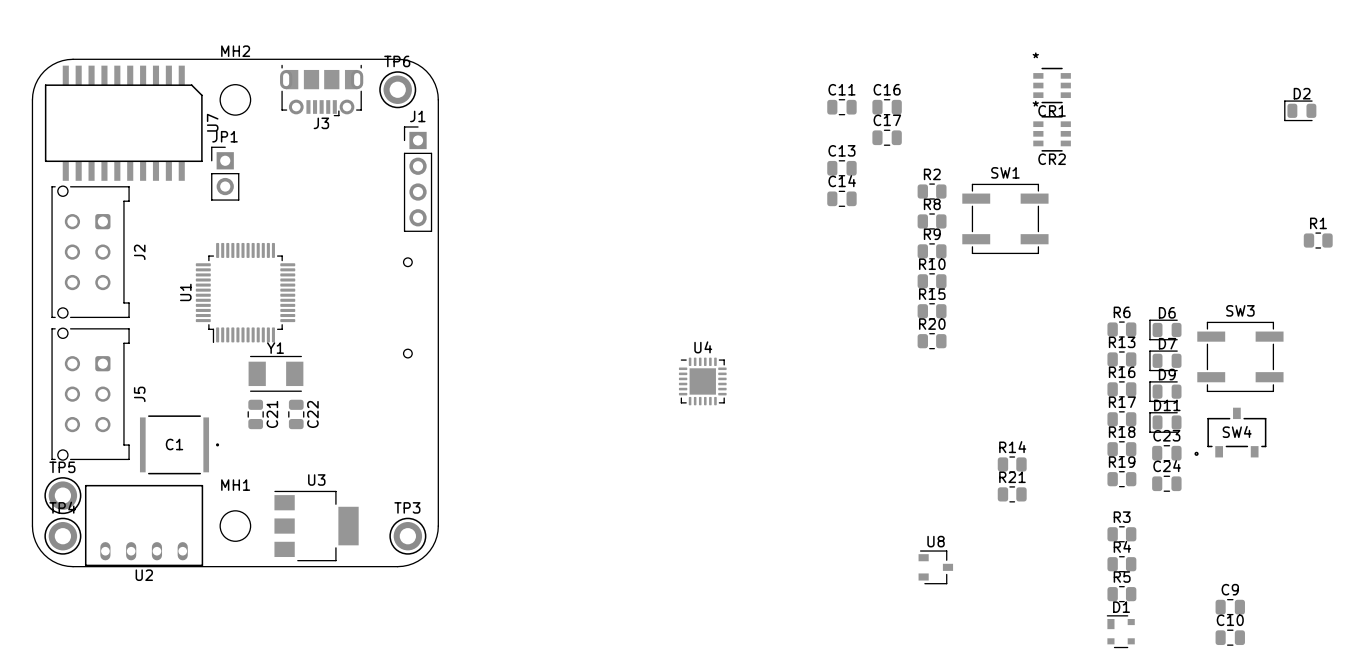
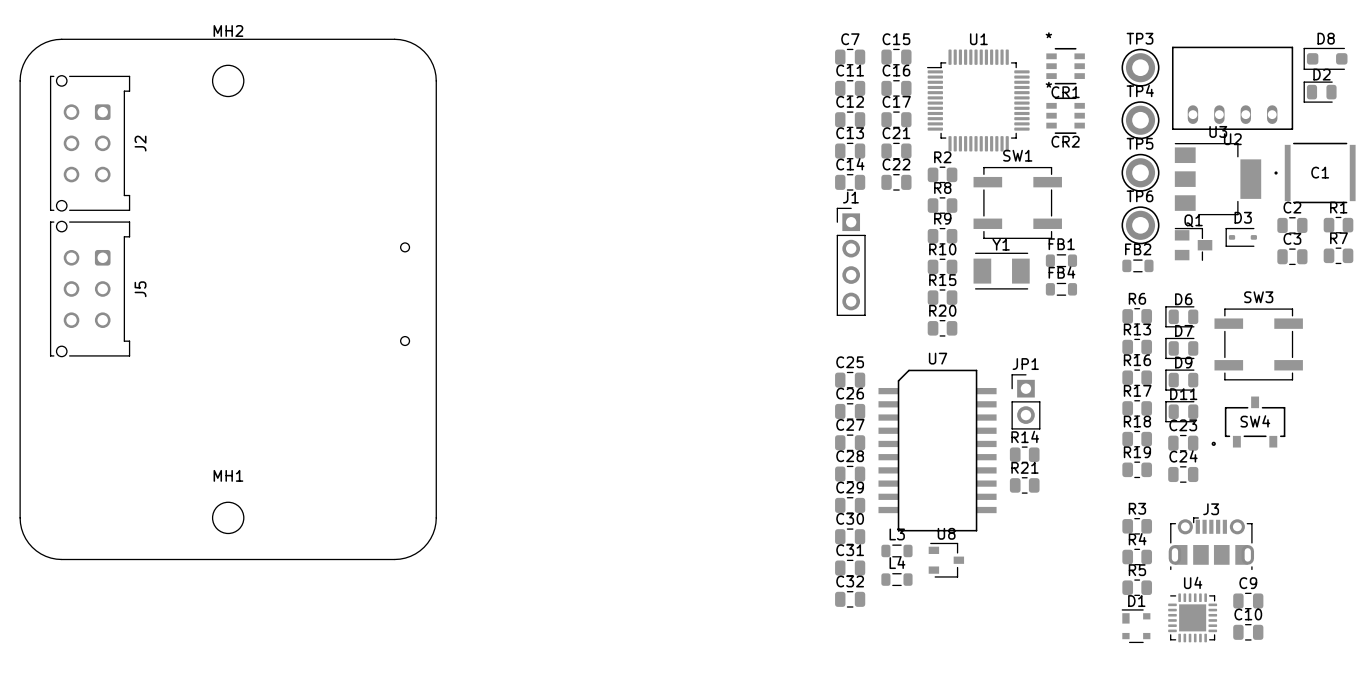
C7: none -> (850, 57)
C15: none -> (896, 57)
D8: none -> (1325, 58)
TP6 position: (397, 89) -> (1140, 225)
J3 rotation: 0° (321, 90) -> 180° (1211, 543)
J3 position: (321, 90) -> (1211, 543)
U7 rotation: 0° (123, 123) -> 90° counterclockwise (937, 450)
U7 position: (123, 123) -> (937, 450)
C12: none -> (850, 119)
JP1 position: (225, 173) -> (1025, 401)
J1 position: (418, 179) -> (851, 261)
C2: none -> (1292, 225)
J2 position: (90, 252) -> (90, 143)
D3: none -> (1241, 237)
Q1: none -> (1193, 244)
R7: none -> (1338, 255)
C3: none -> (1292, 256)
FB1: none -> (1061, 260)
FB2: none -> (1137, 265)
U1 rotation: 0° (245, 292) -> 90° clockwise (978, 100)
U1 position: (245, 292) -> (978, 100)
FB4: none -> (1061, 289)
Y1 position: (275, 373) -> (1001, 271)
U4 position: (702, 381) -> (1192, 617)
C25: none -> (850, 380)
J5 position: (90, 394) -> (90, 289)
C21 rotation: 0° (255, 414) -> 90° clockwise (896, 151)
C21 position: (255, 414) -> (896, 151)
C21 name position: C21 (272, 414) -> C21 (896, 133)
C22 rotation: 0° (296, 414) -> 90° clockwise (896, 182)
C22 position: (296, 414) -> (896, 182)
C22 name position: C22 (312, 414) -> C22 (896, 164)
C26: none -> (850, 411)
C1 rotation: 0° (179, 444) -> 180° (1315, 173)
C1 position: (179, 444) -> (1315, 173)
C27: none -> (850, 442)
C28: none -> (850, 474)
TP5 position: (62, 495) -> (1140, 172)
C29: none -> (850, 505)
U2 position: (144, 525) -> (1232, 88)
U3 position: (316, 526) -> (1217, 179)
TP4 position: (62, 536) -> (1140, 120)
TP3 position: (407, 536) -> (1140, 67)
C30: none -> (850, 536)
L3: none -> (896, 550)
C31: none -> (850, 568)
L4: none -> (896, 579)
C32: none -> (850, 599)

